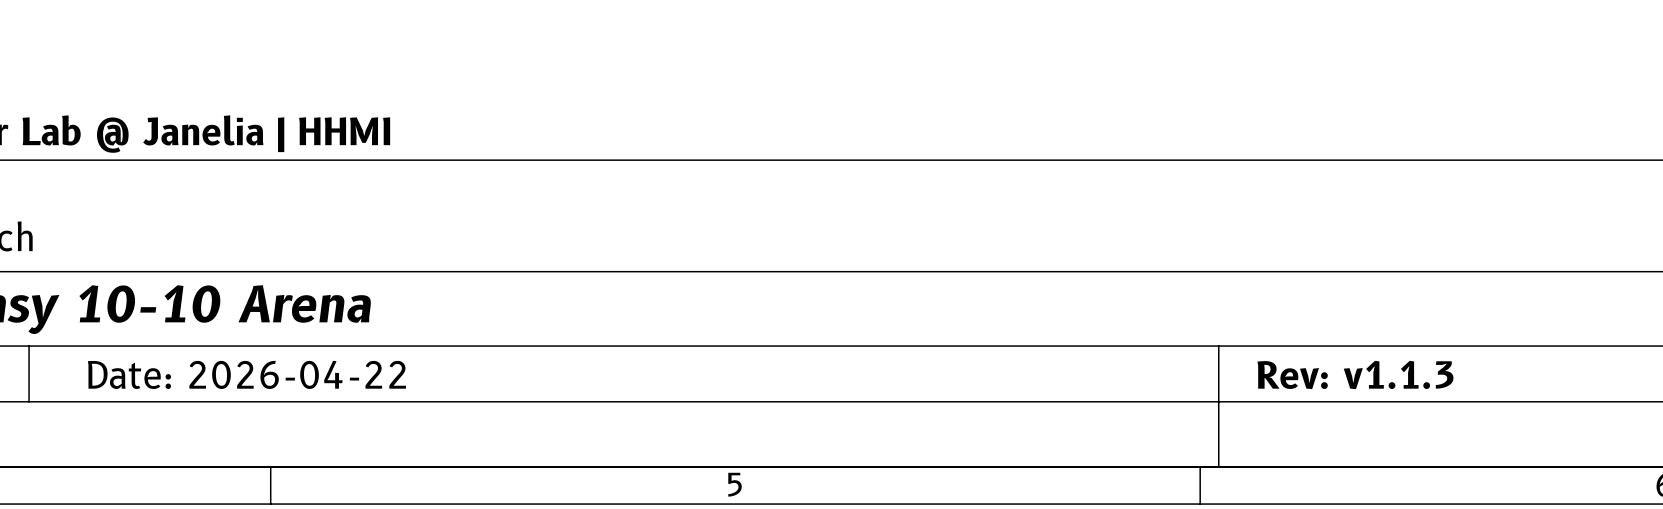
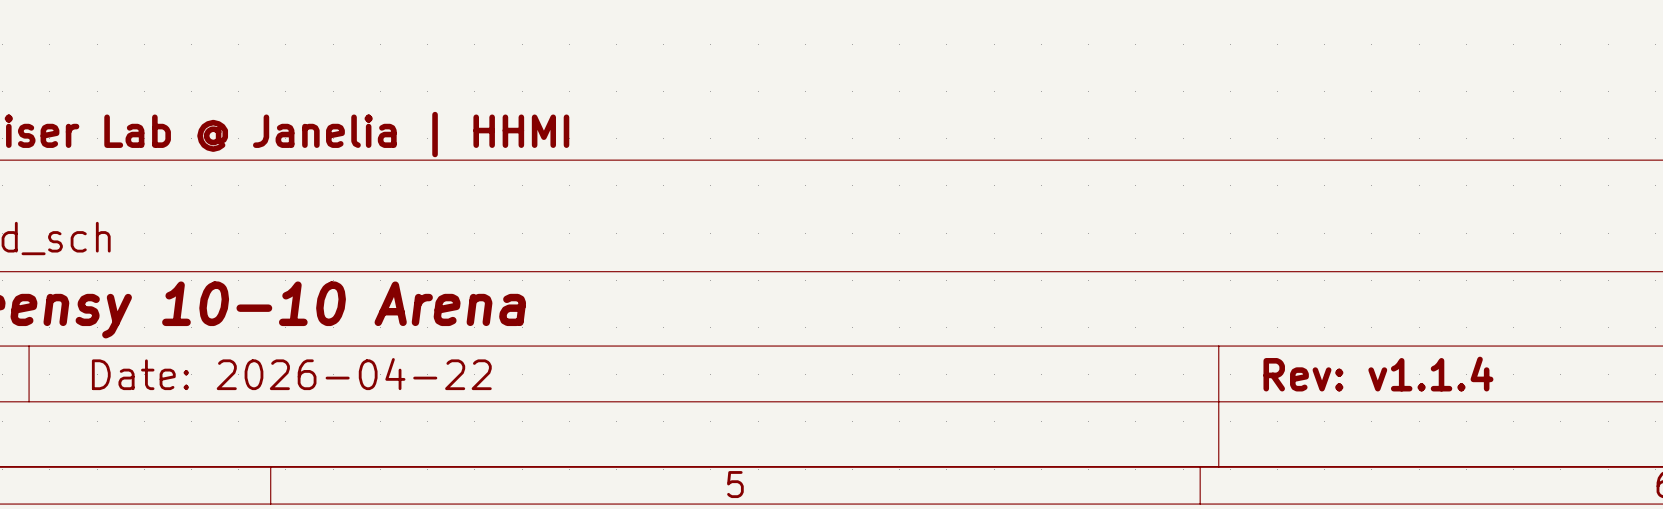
title block: Rev: v1.1.3 (1355, 374) -> Rev: v1.1.4 (1378, 374)

